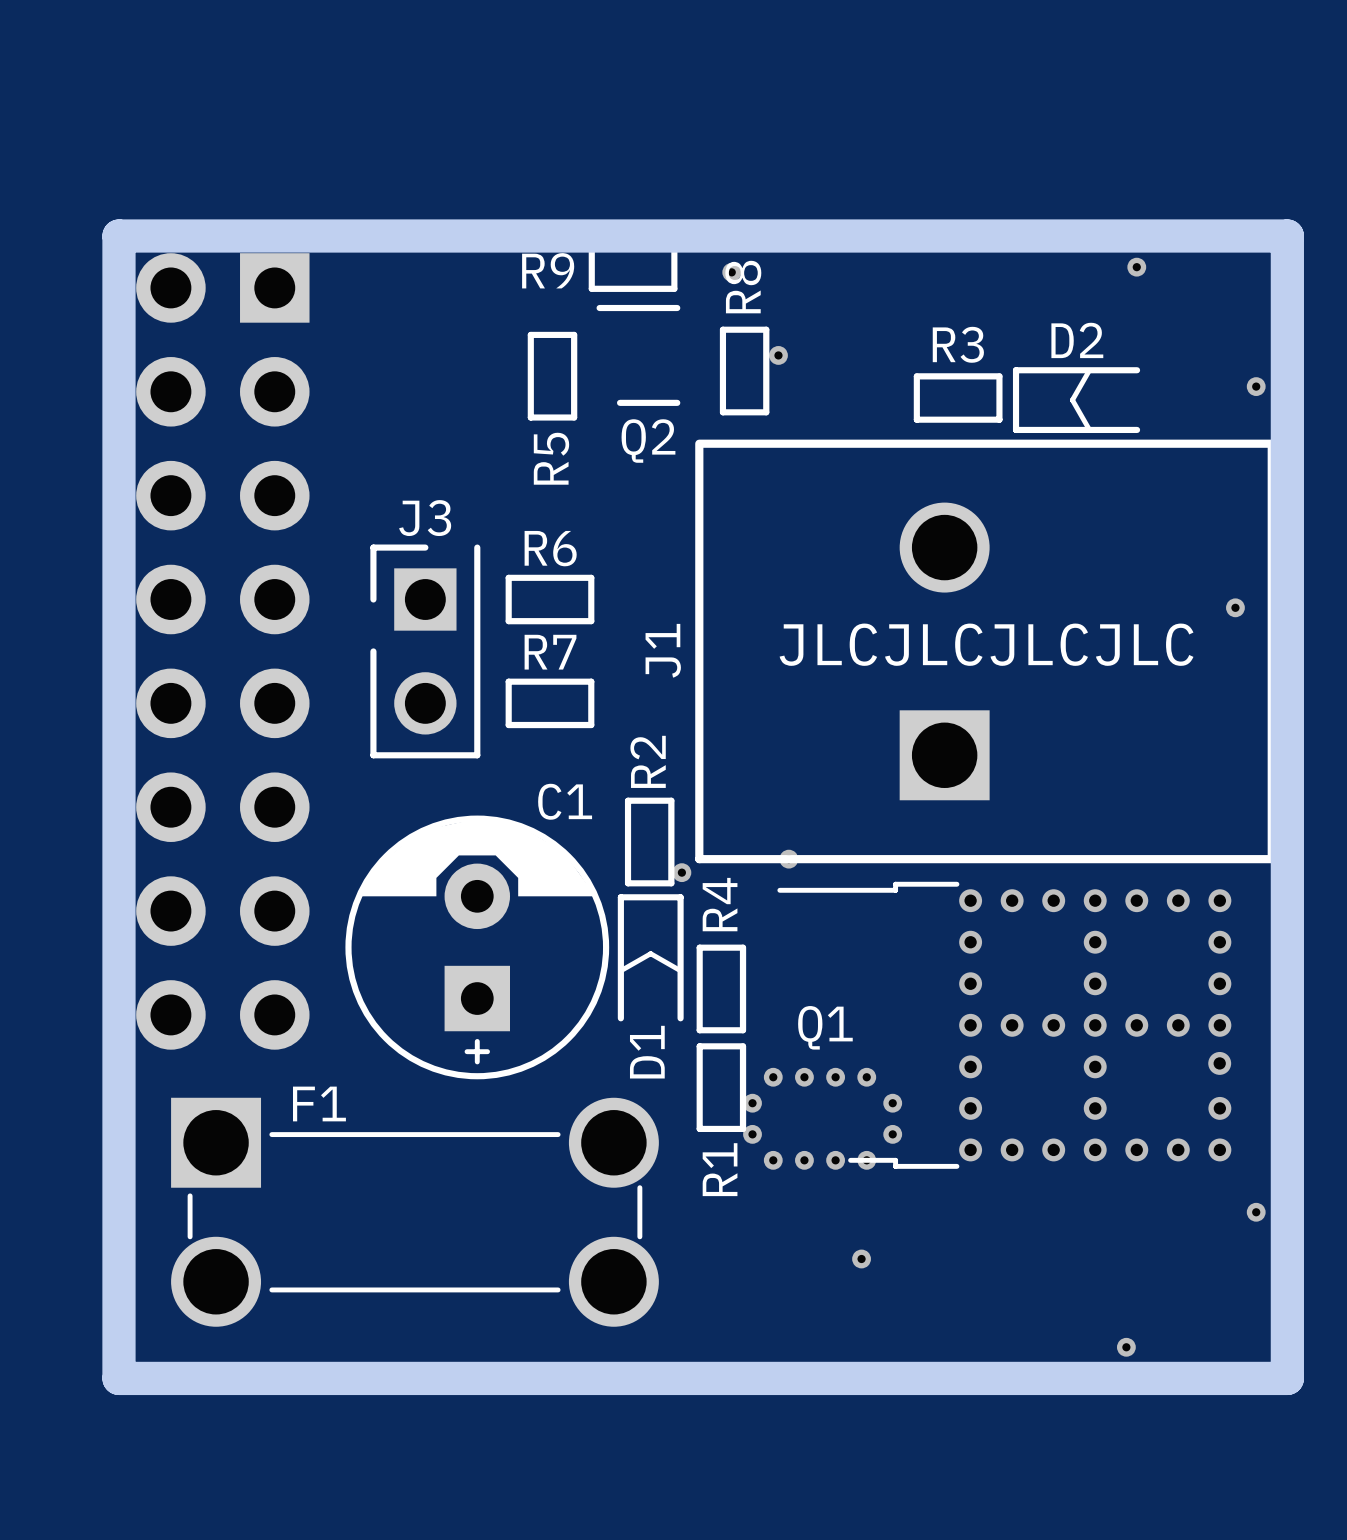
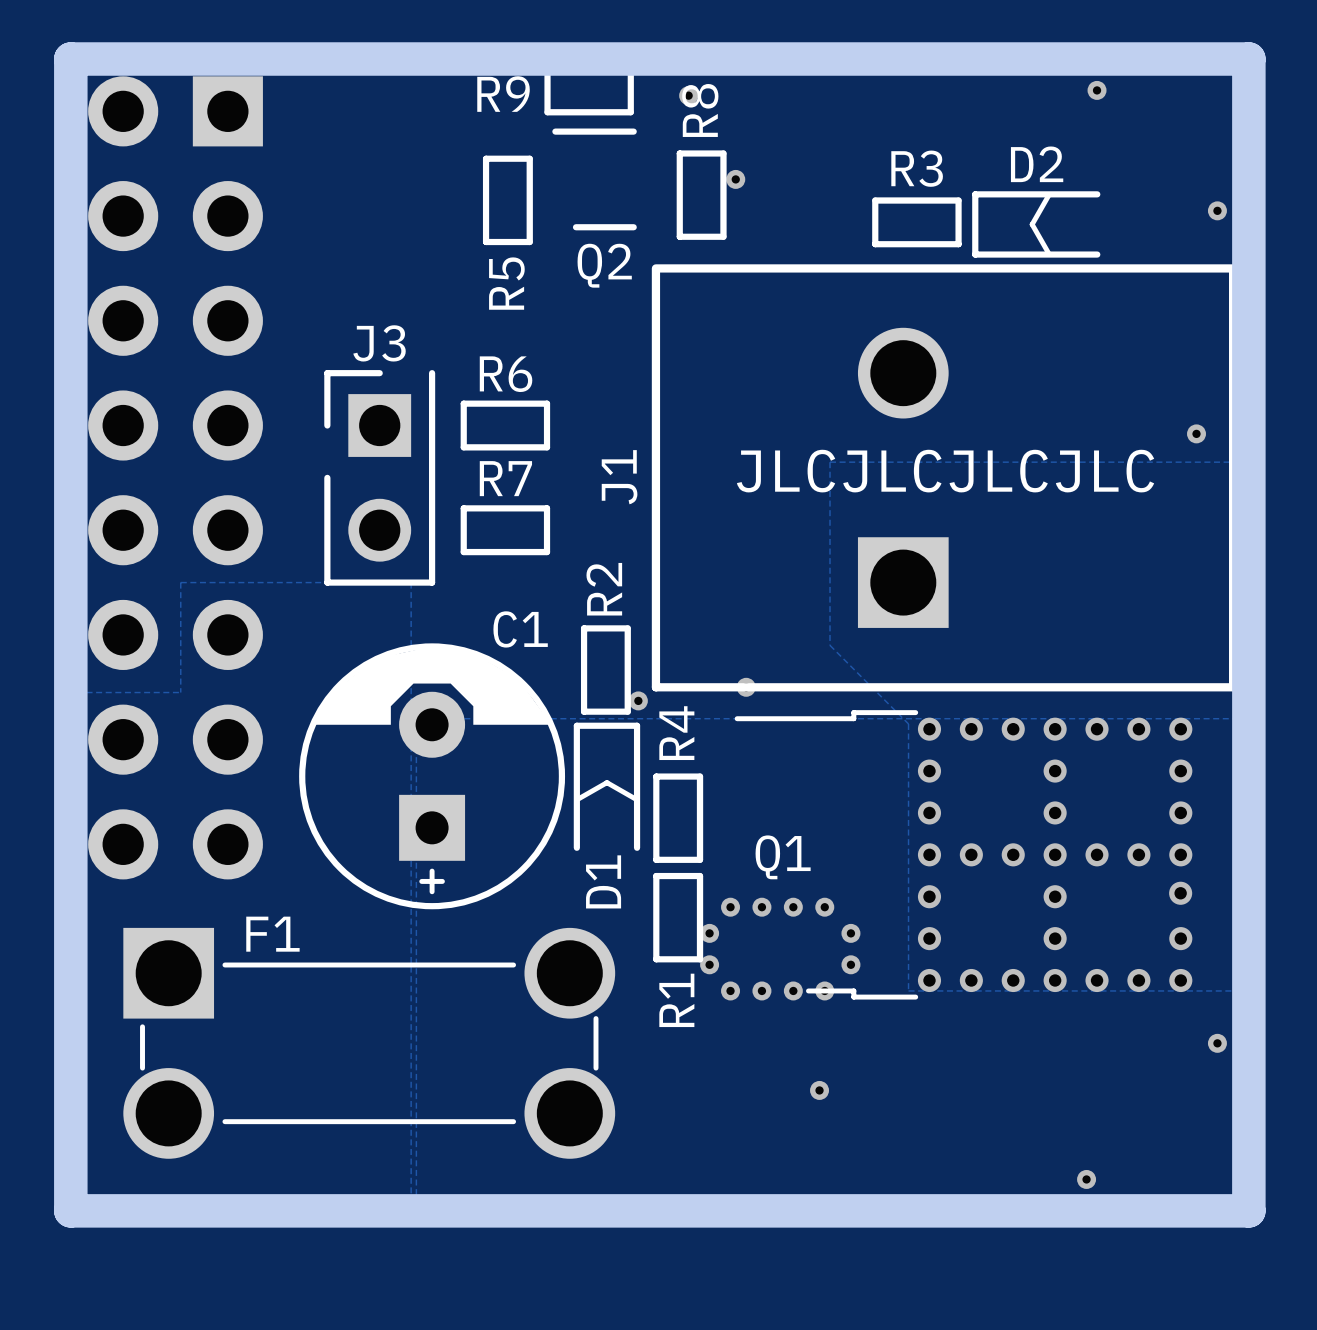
zone outline: none -> (1233, 462) (830, 462) (830, 645) (908, 723) (908, 990) (1233, 990)
zone outline: none -> (86, 692) (180, 692) (180, 582) (411, 582) (411, 1195)
zone outline: none -> (1233, 718) (416, 718) (416, 1195)

